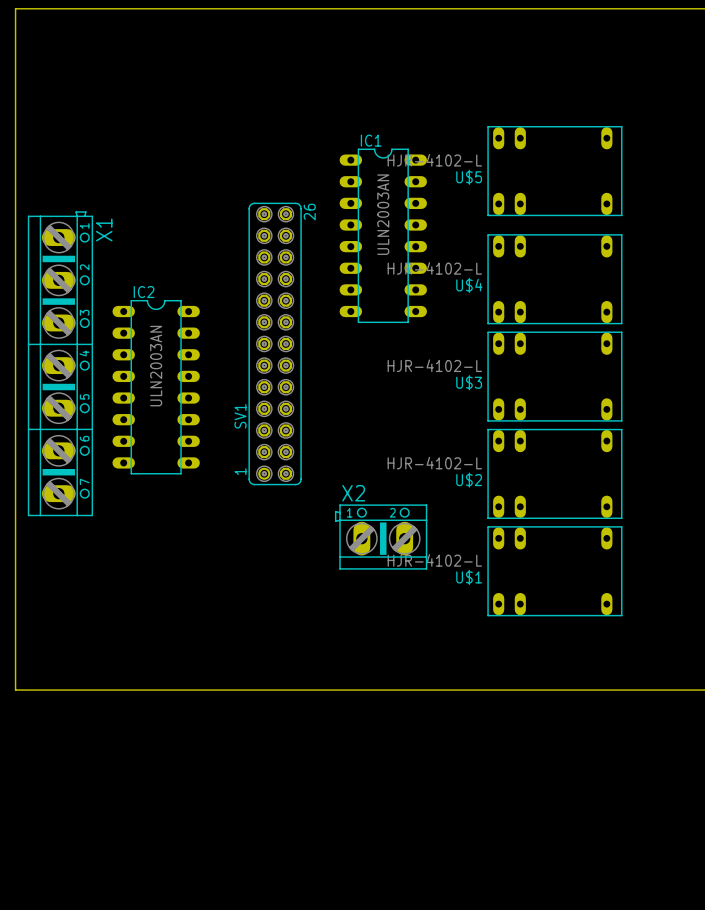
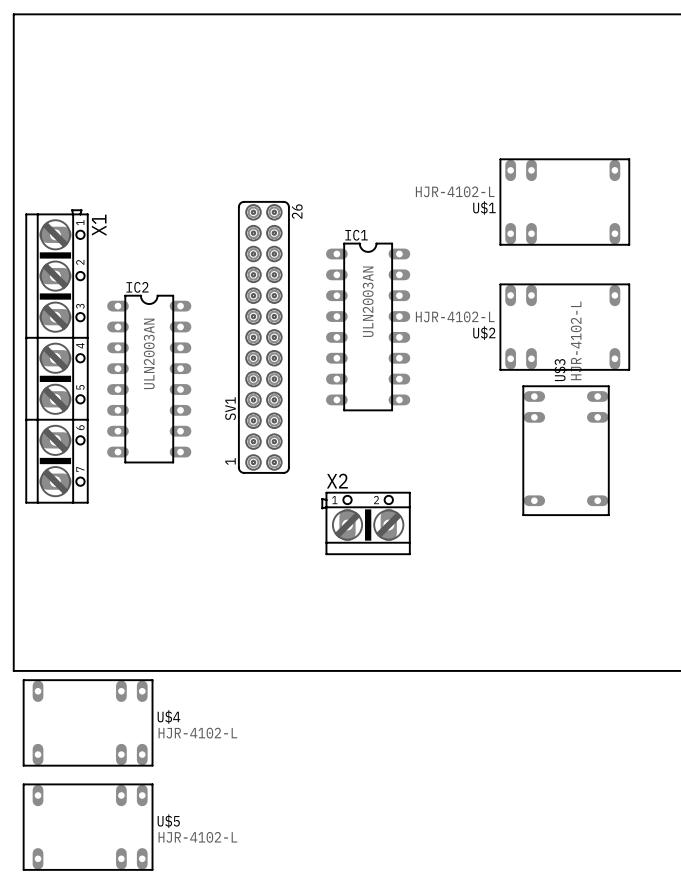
U$5 rotation: 0° (554, 171) -> 180° (88, 827)
U$5 position: (554, 171) -> (88, 827)
IC1 position: (383, 235) -> (368, 326)
U$4 rotation: 0° (554, 279) -> 180° (88, 722)
U$4 position: (554, 279) -> (88, 722)
U$3 rotation: 0° (554, 376) -> 90° clockwise (566, 450)
U$3 position: (554, 376) -> (566, 450)
U$2 position: (554, 473) -> (564, 327)
U$1 position: (554, 571) -> (564, 202)

